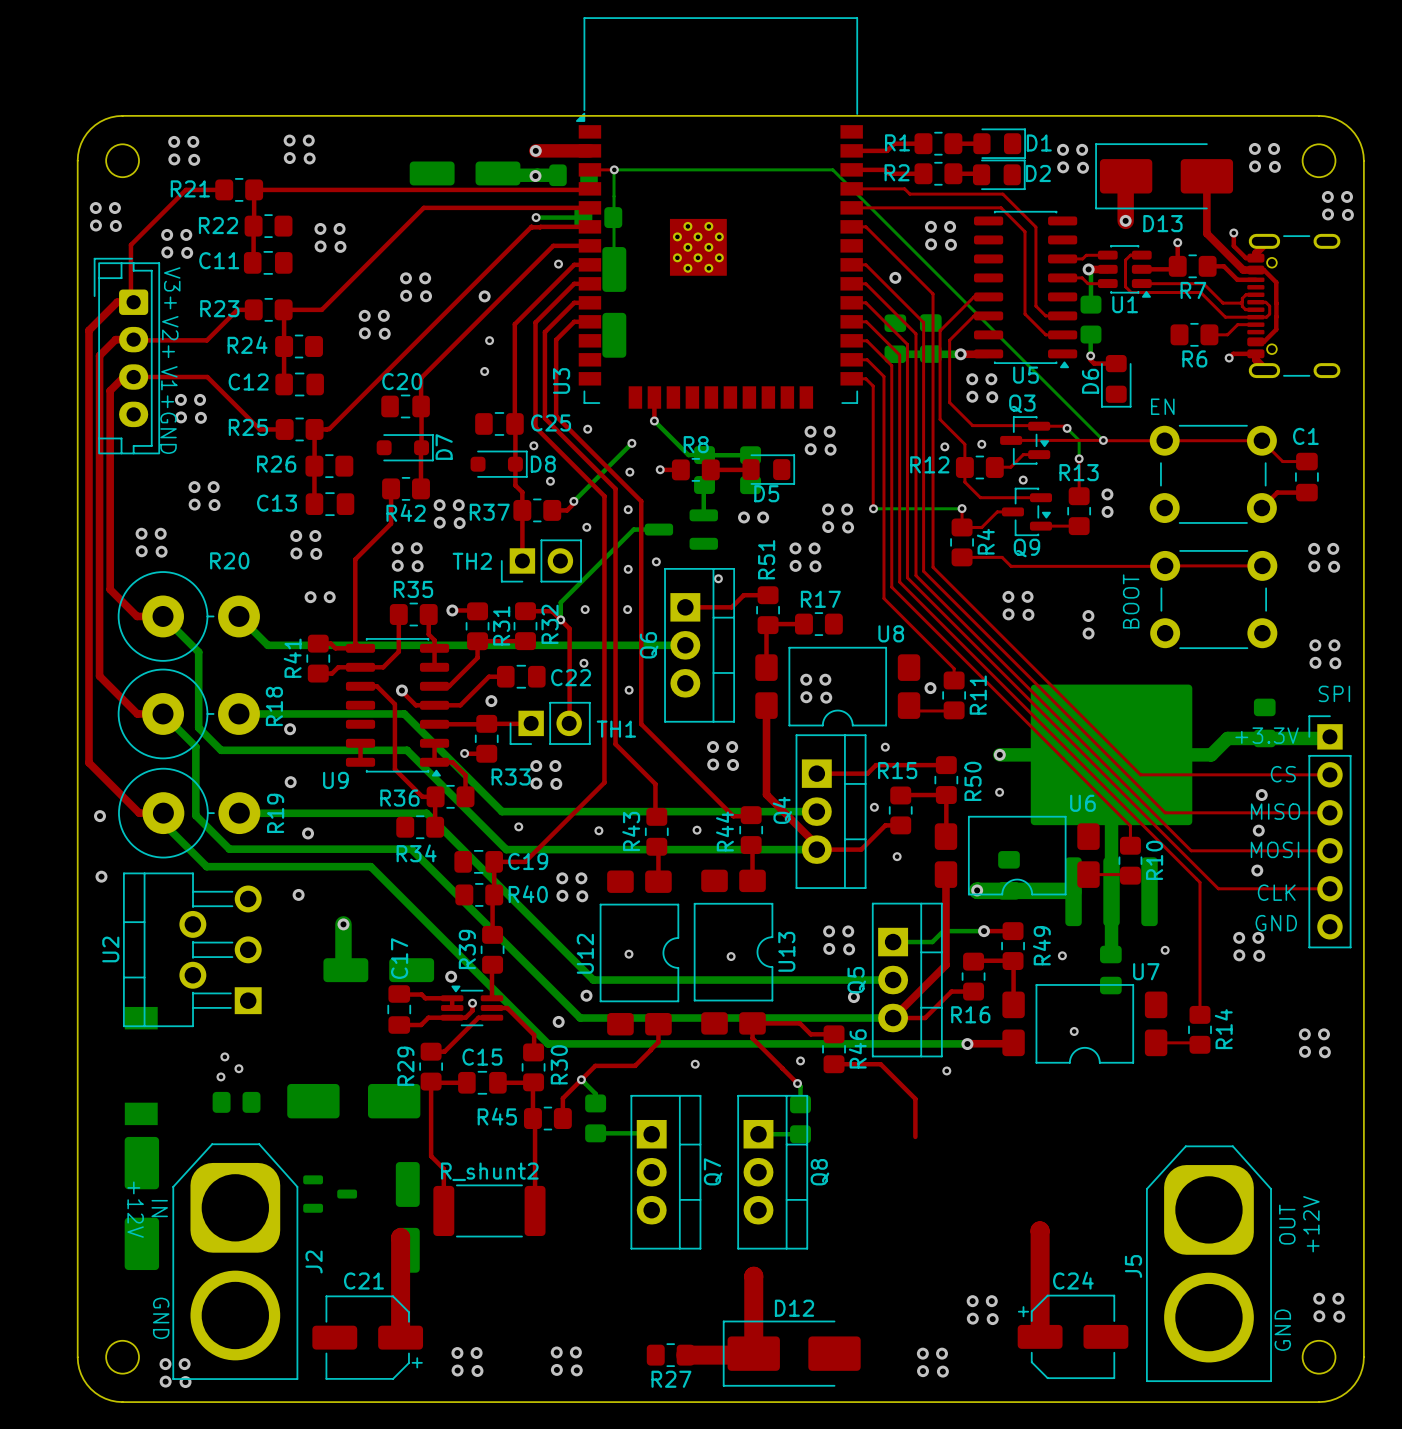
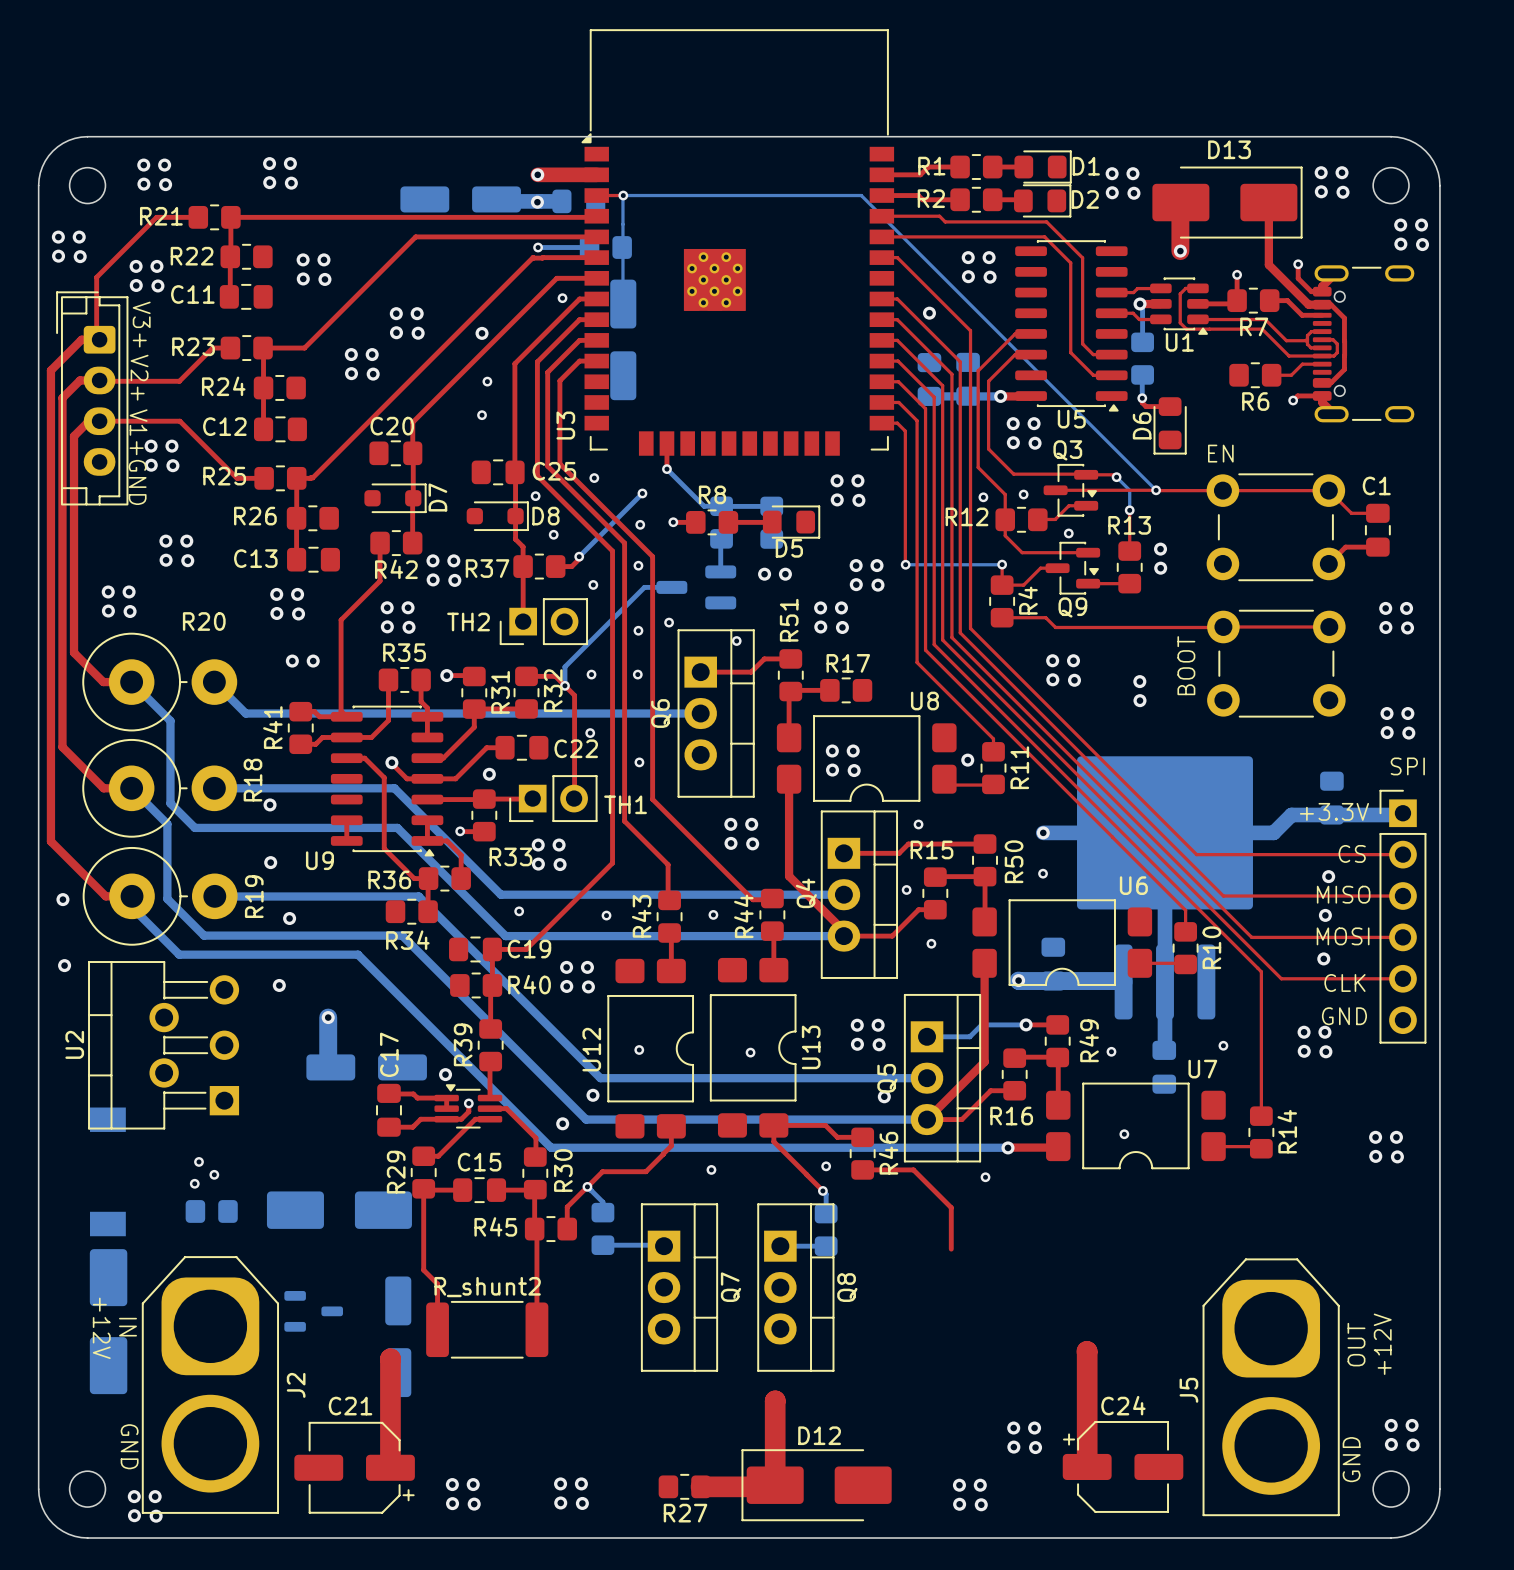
D13 rotation: 0° (1164, 176) -> 180° (1227, 202)

